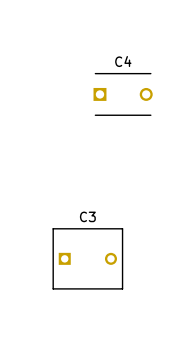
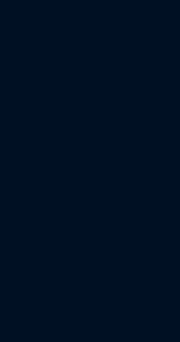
C4: (123, 94) -> none
C3: (87, 258) -> none

